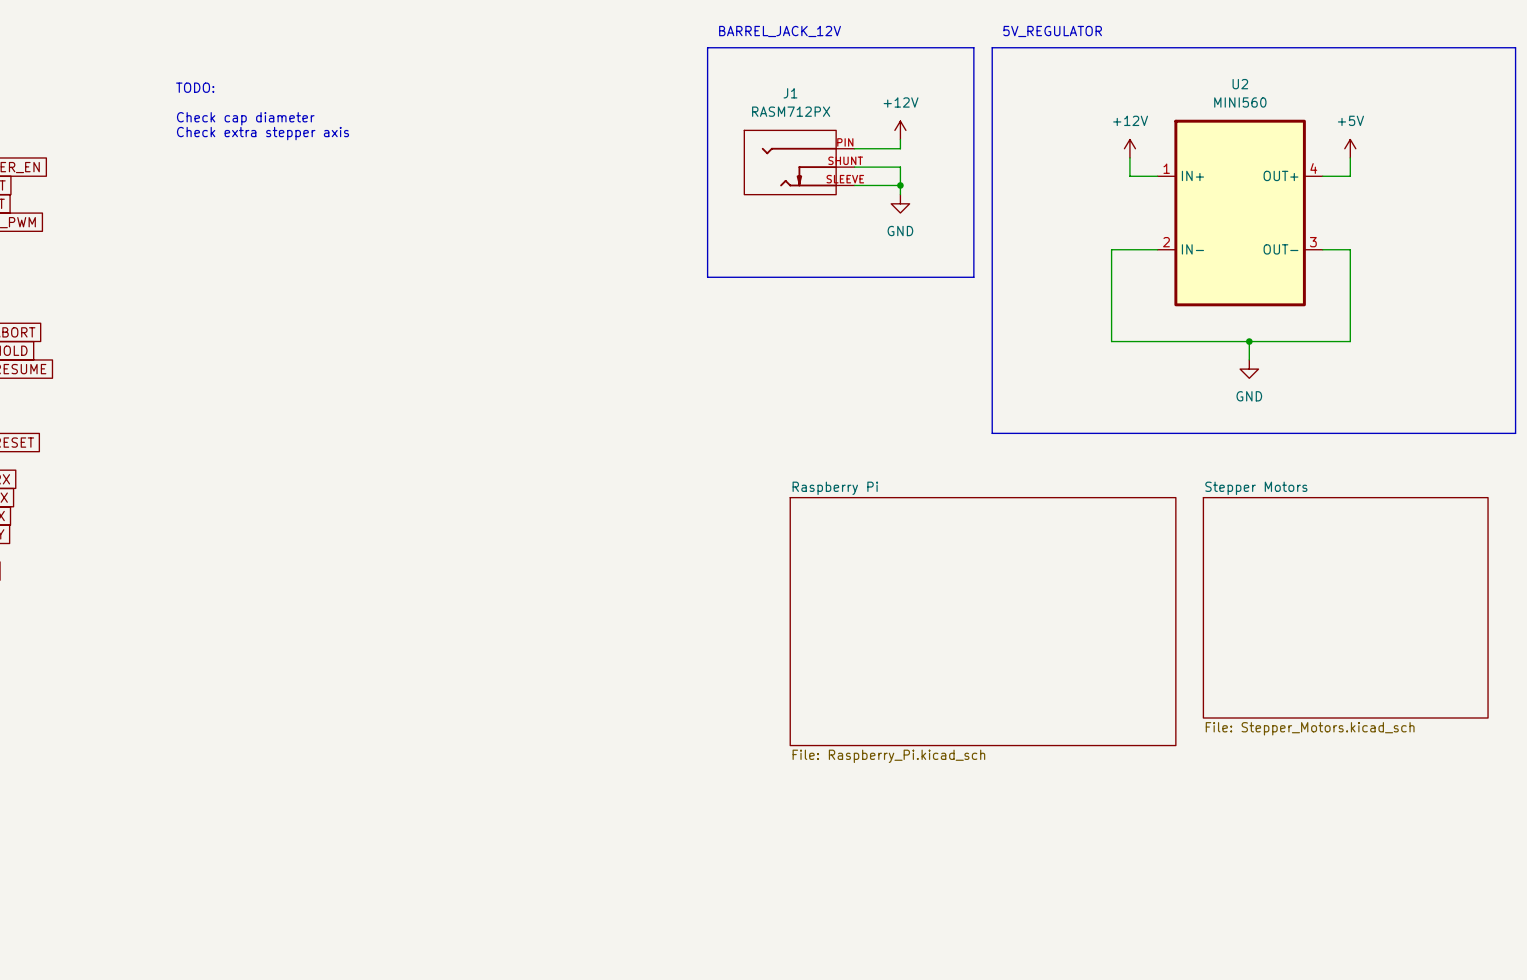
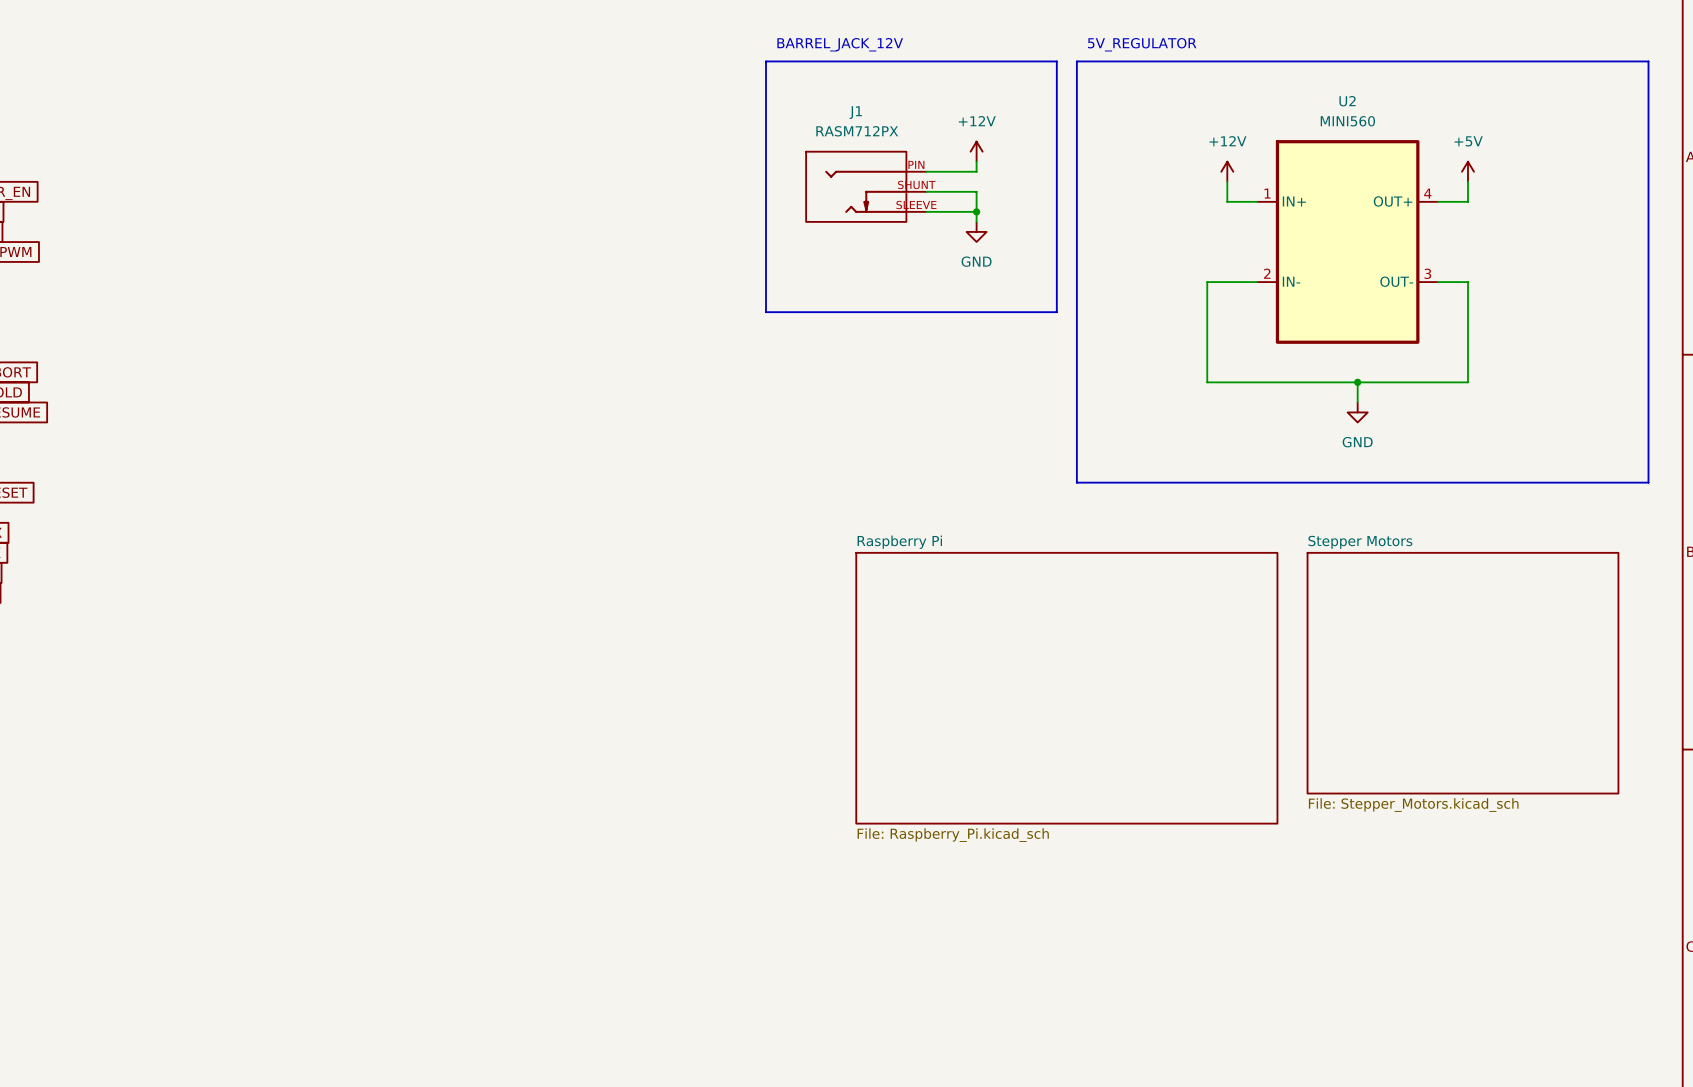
text: TODO: (195, 87) -> none
text: Check cap diameter (245, 118) -> none
text: Check extra stepper axis (263, 133) -> none

